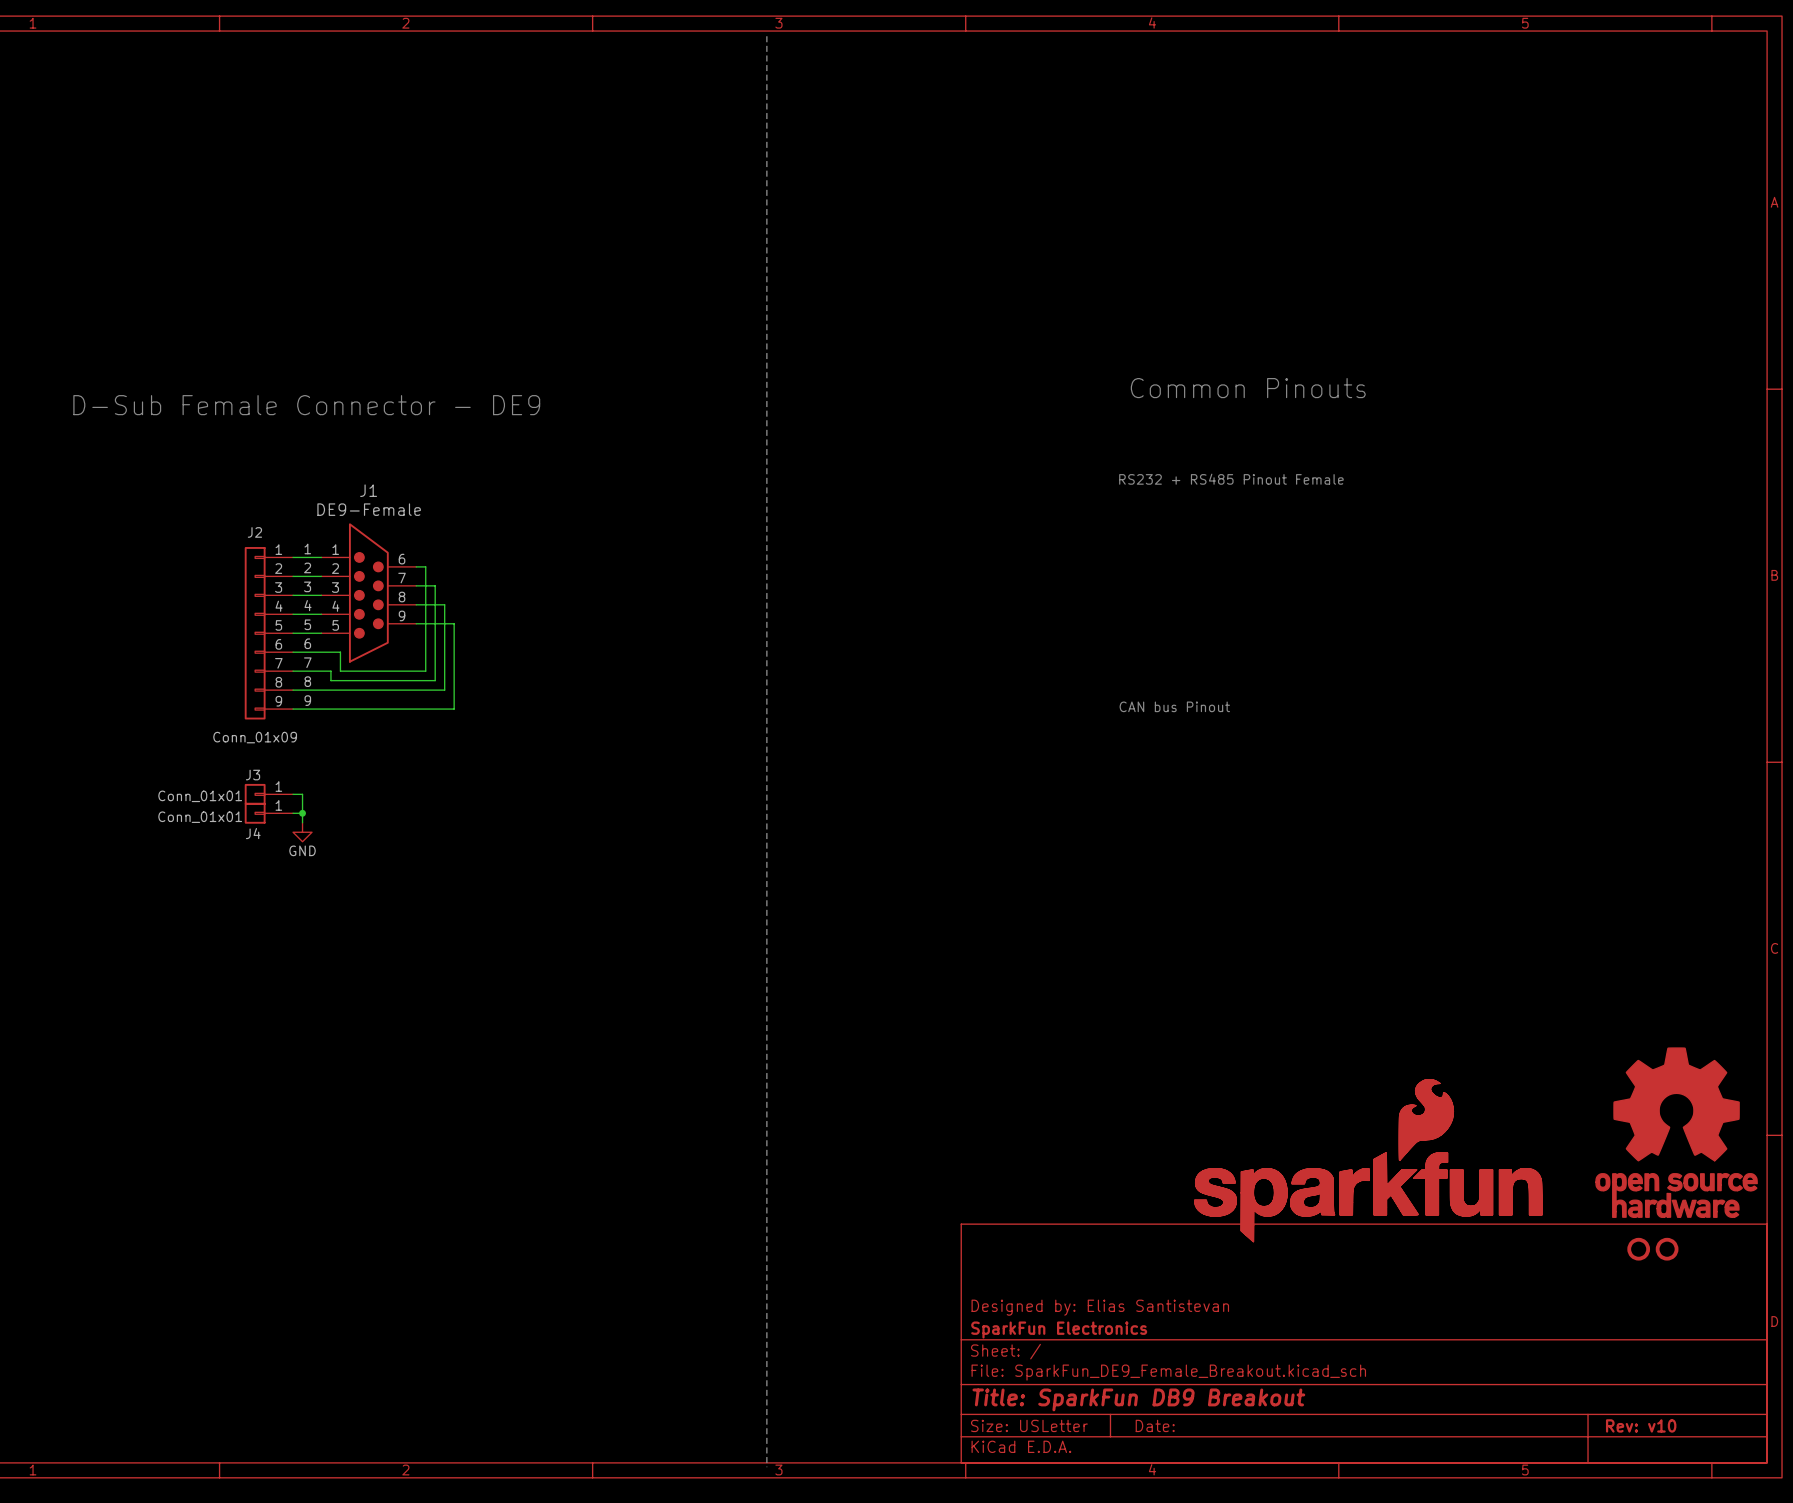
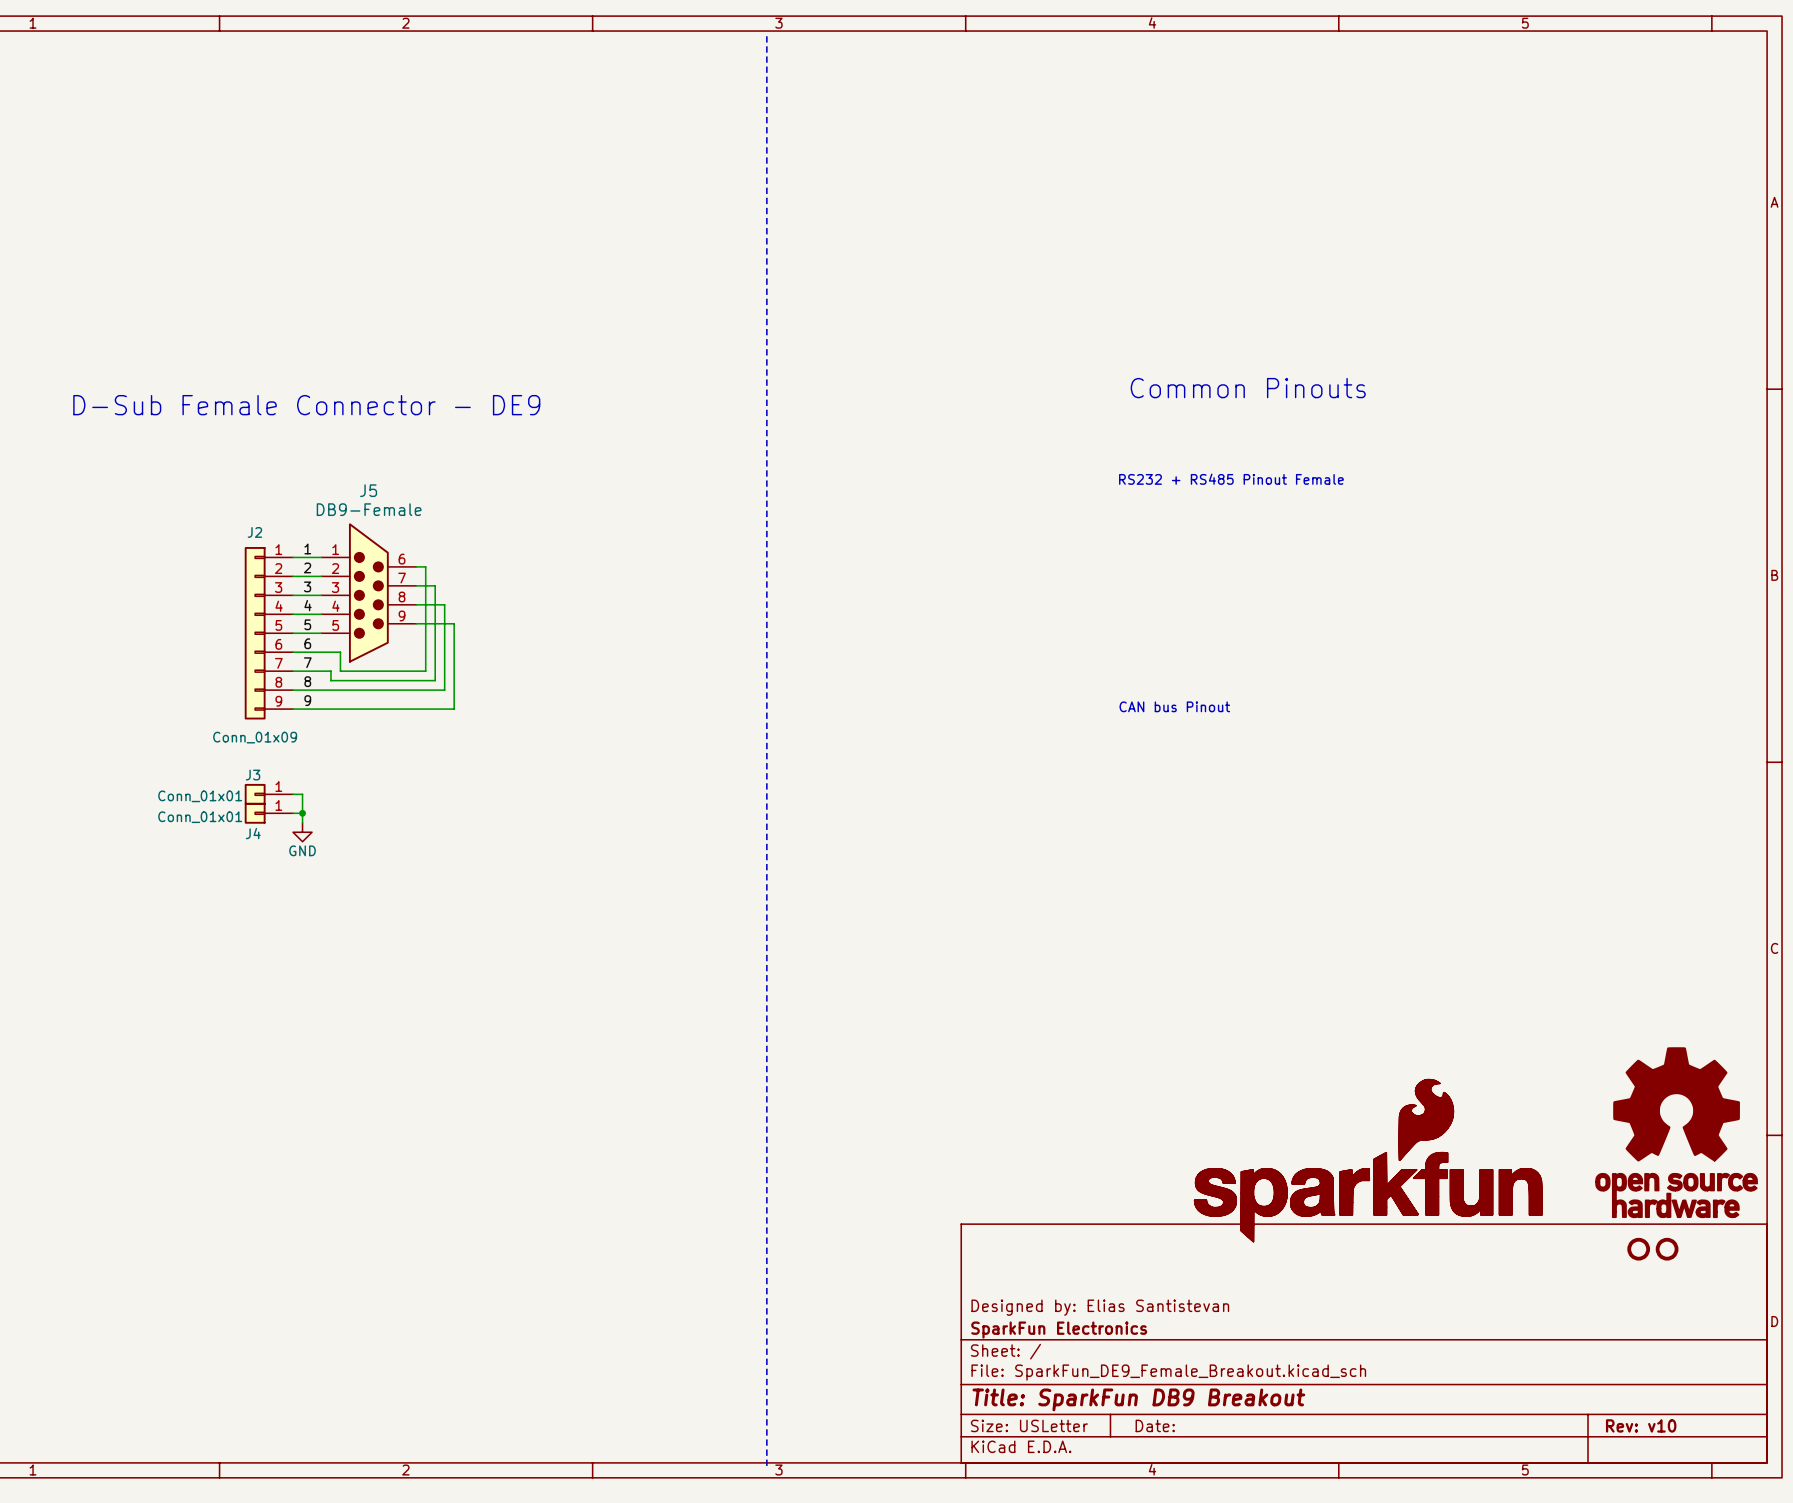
J1 name: J1 (368, 490) -> J5 (368, 490)
J1 value: DE9-Female (369, 509) -> DB9-Female (369, 509)

